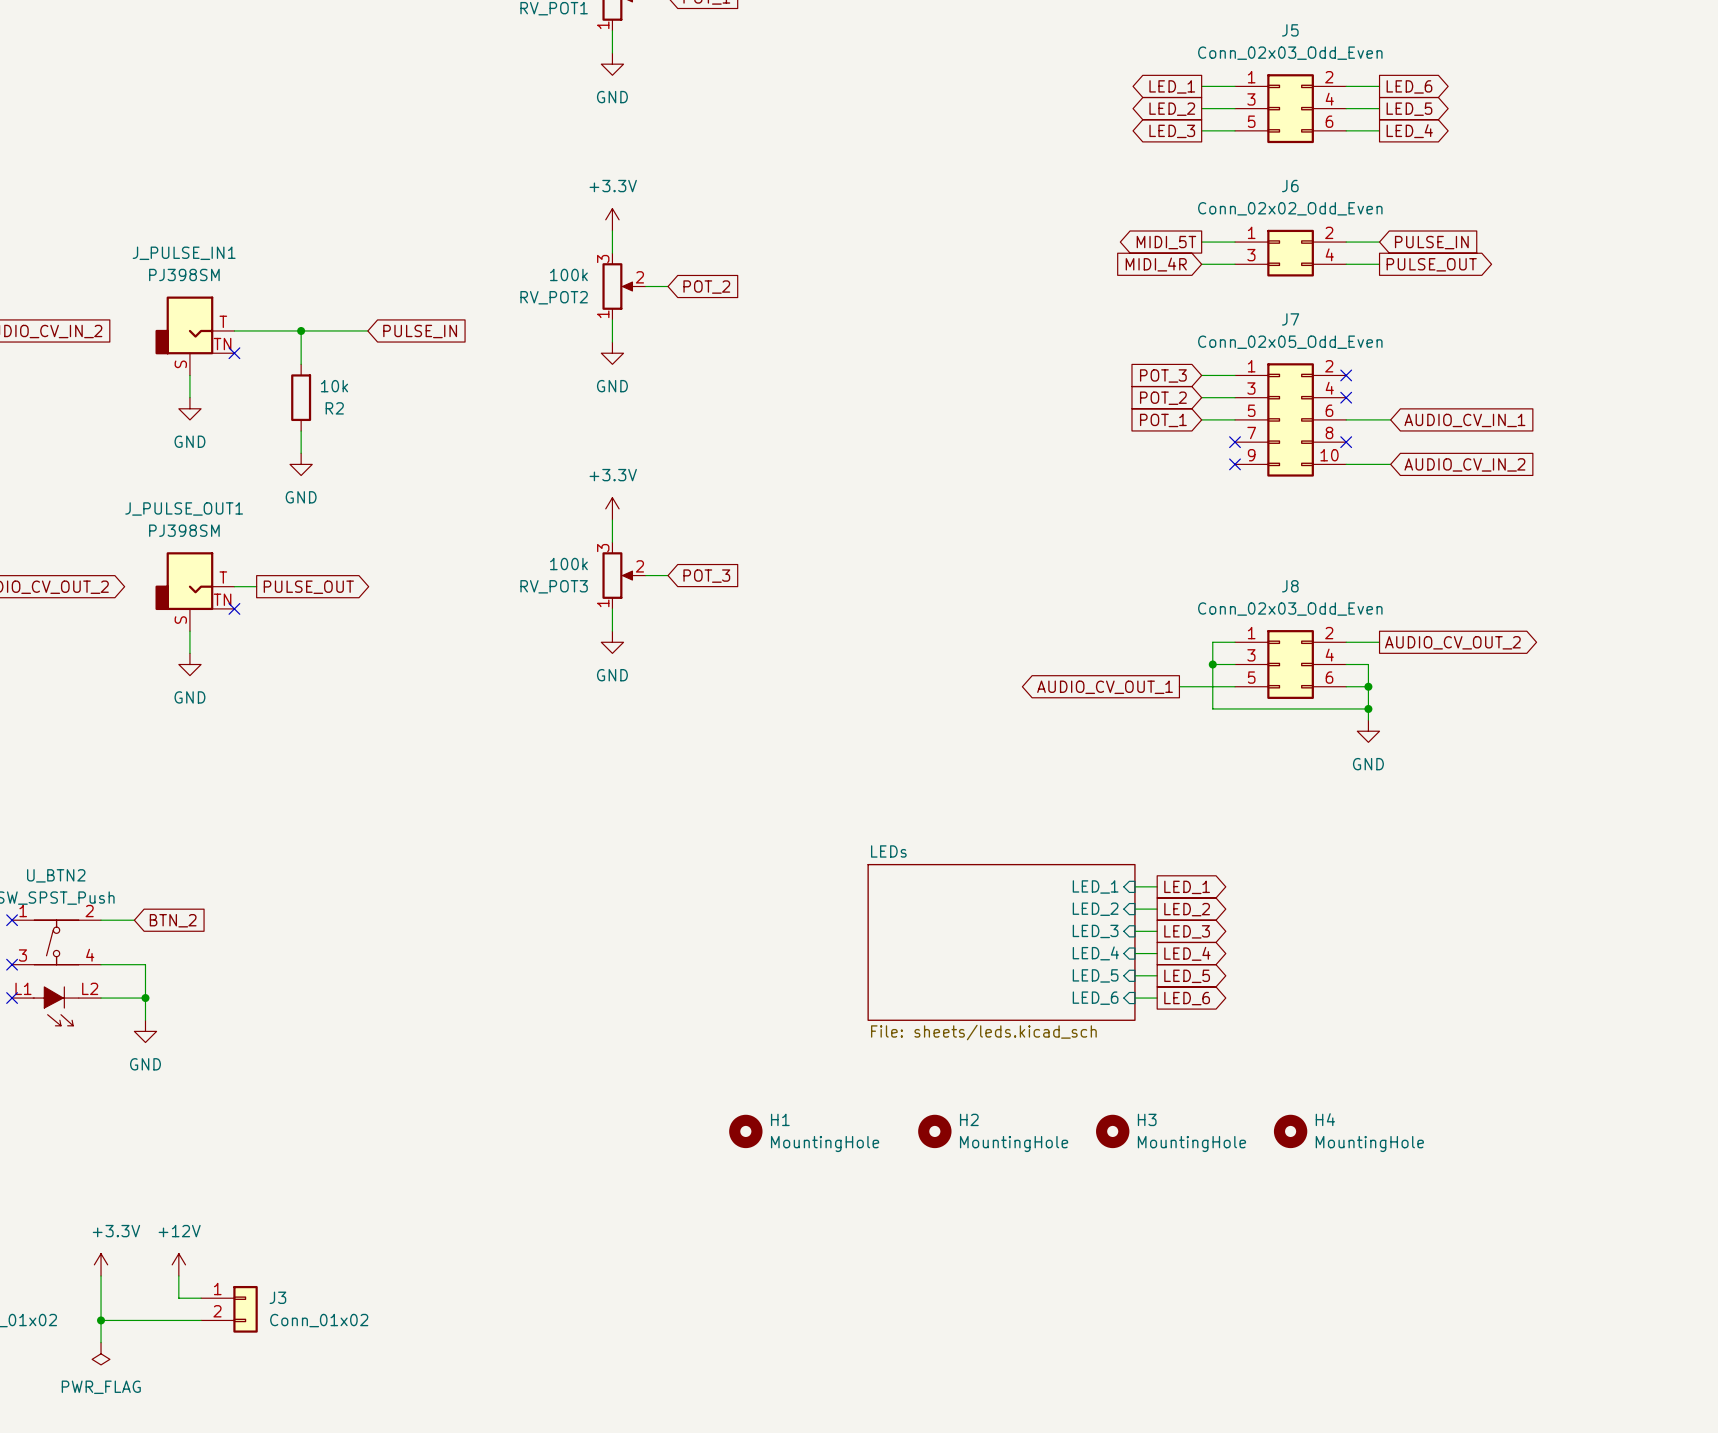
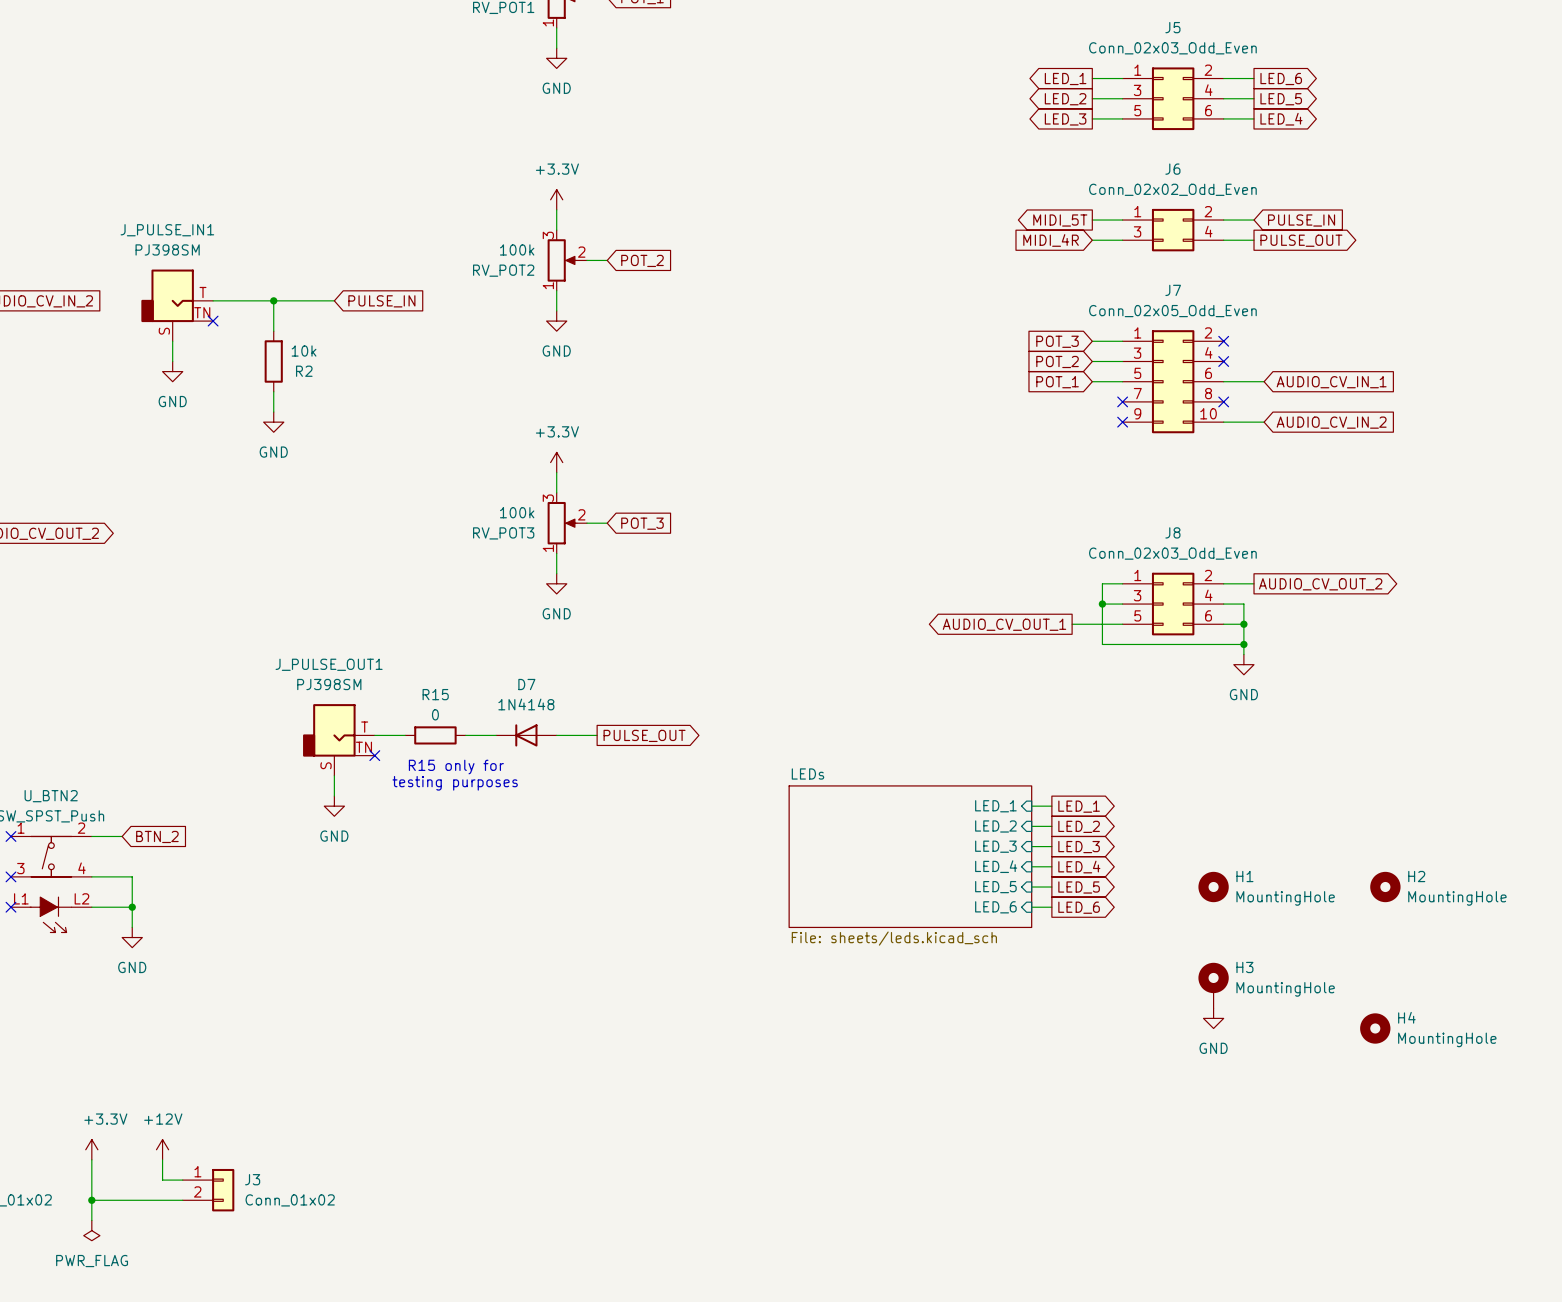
wire: (234, 586) (256, 586) -> none
global label: PULSE_OUT (308, 587) -> none
J_PULSE_OUT1 position: (194, 591) -> (338, 739)
no-connect mark: (234, 608) -> none
wire: (189, 631) (189, 653) -> none
power symbol: GND (189, 664) -> none
wire: none -> (374, 735) (405, 735)
R15: none -> 0 (435, 735)
wire: none -> (465, 735) (496, 735)
D7: none -> 1N4148 (526, 735)
wire: none -> (556, 735) (597, 735)
global label: none -> PULSE_OUT (644, 735)
no-connect mark: none -> (374, 755)
text: none -> R15 only for (456, 767)
wire: none -> (334, 775) (334, 796)
text: none -> testing purposes (455, 783)
power symbol: none -> GND (334, 806)
H3 symbol: [1096, 1114, 1130, 1149] -> [1198, 962, 1229, 1009]
power symbol: none -> GND (1213, 1018)
H1 position: (745, 1131) -> (1213, 887)
H2 position: (934, 1131) -> (1385, 887)
H4 position: (1290, 1131) -> (1375, 1028)

